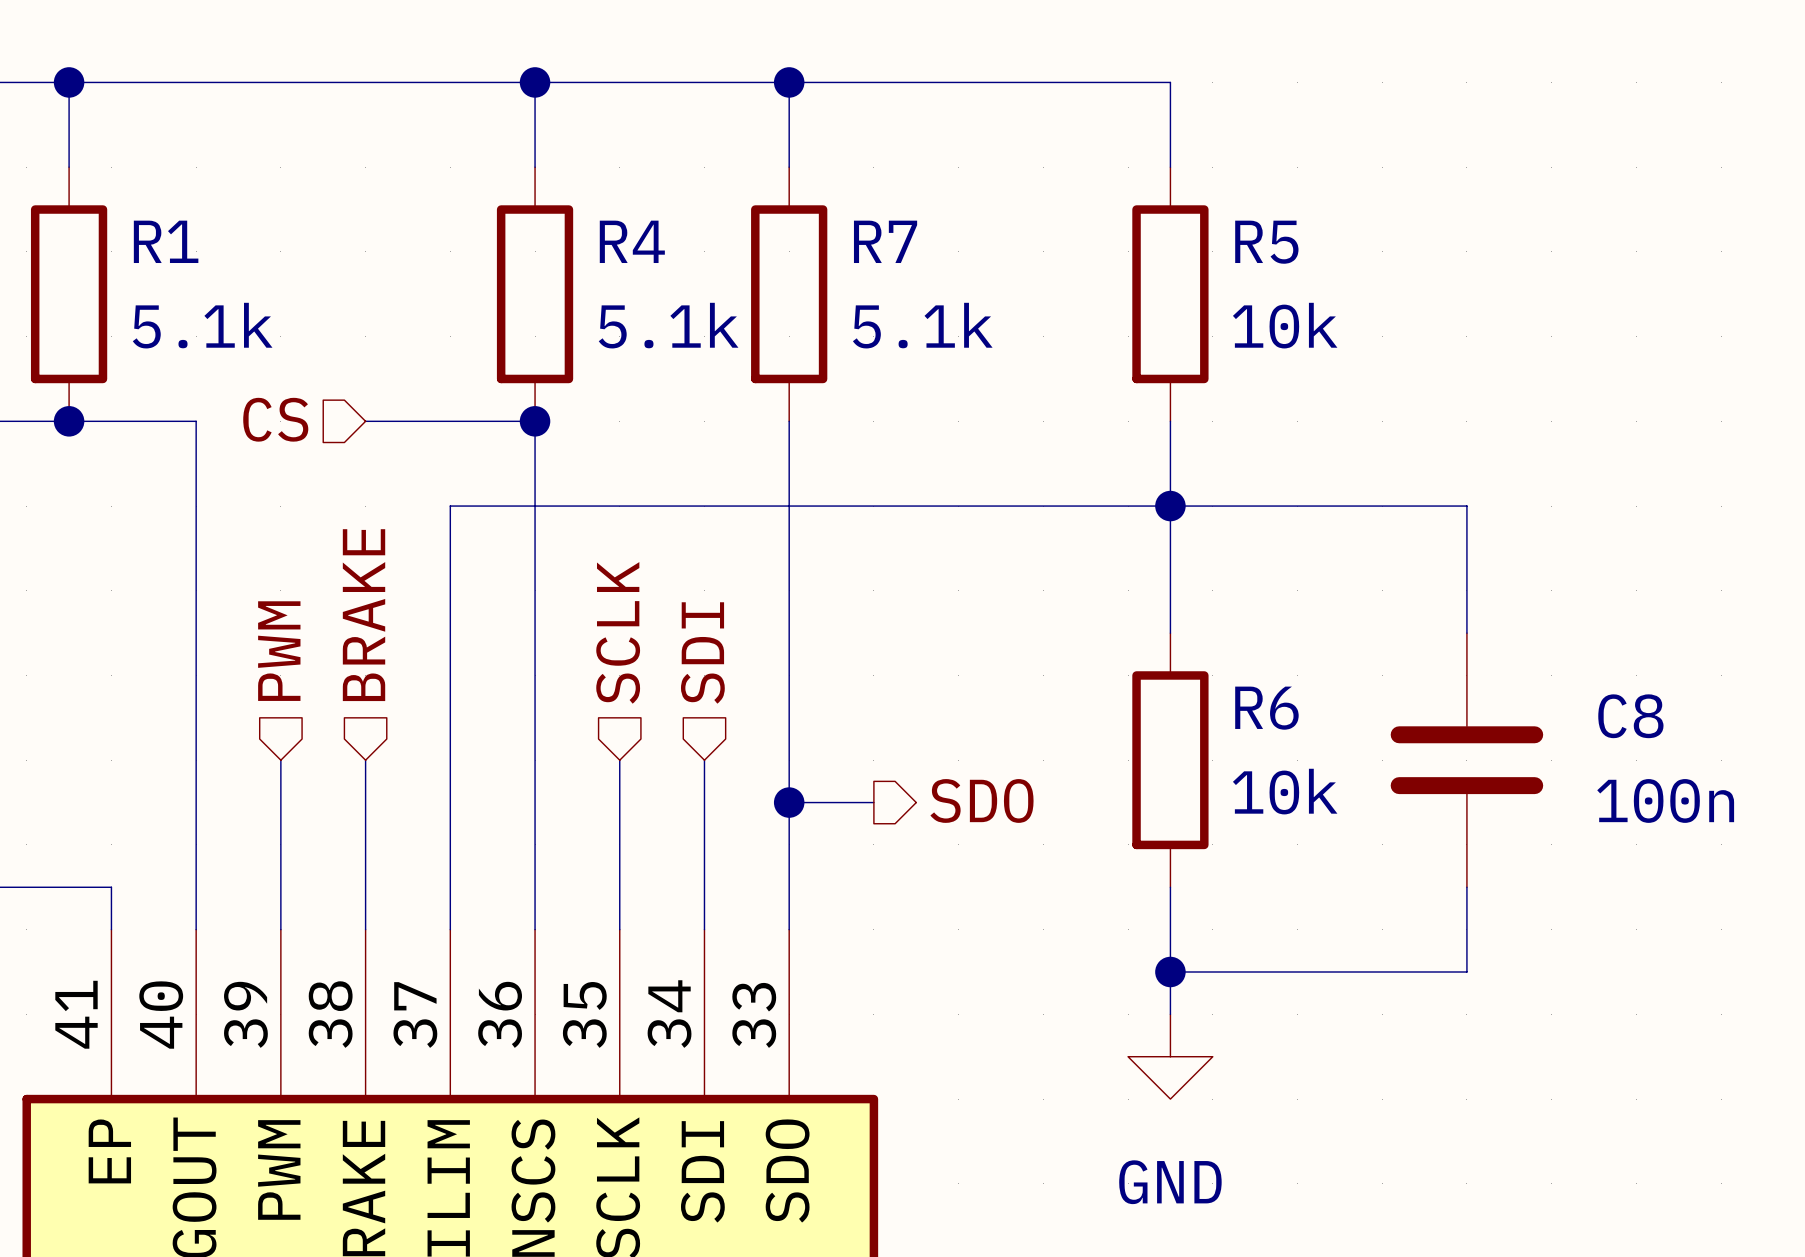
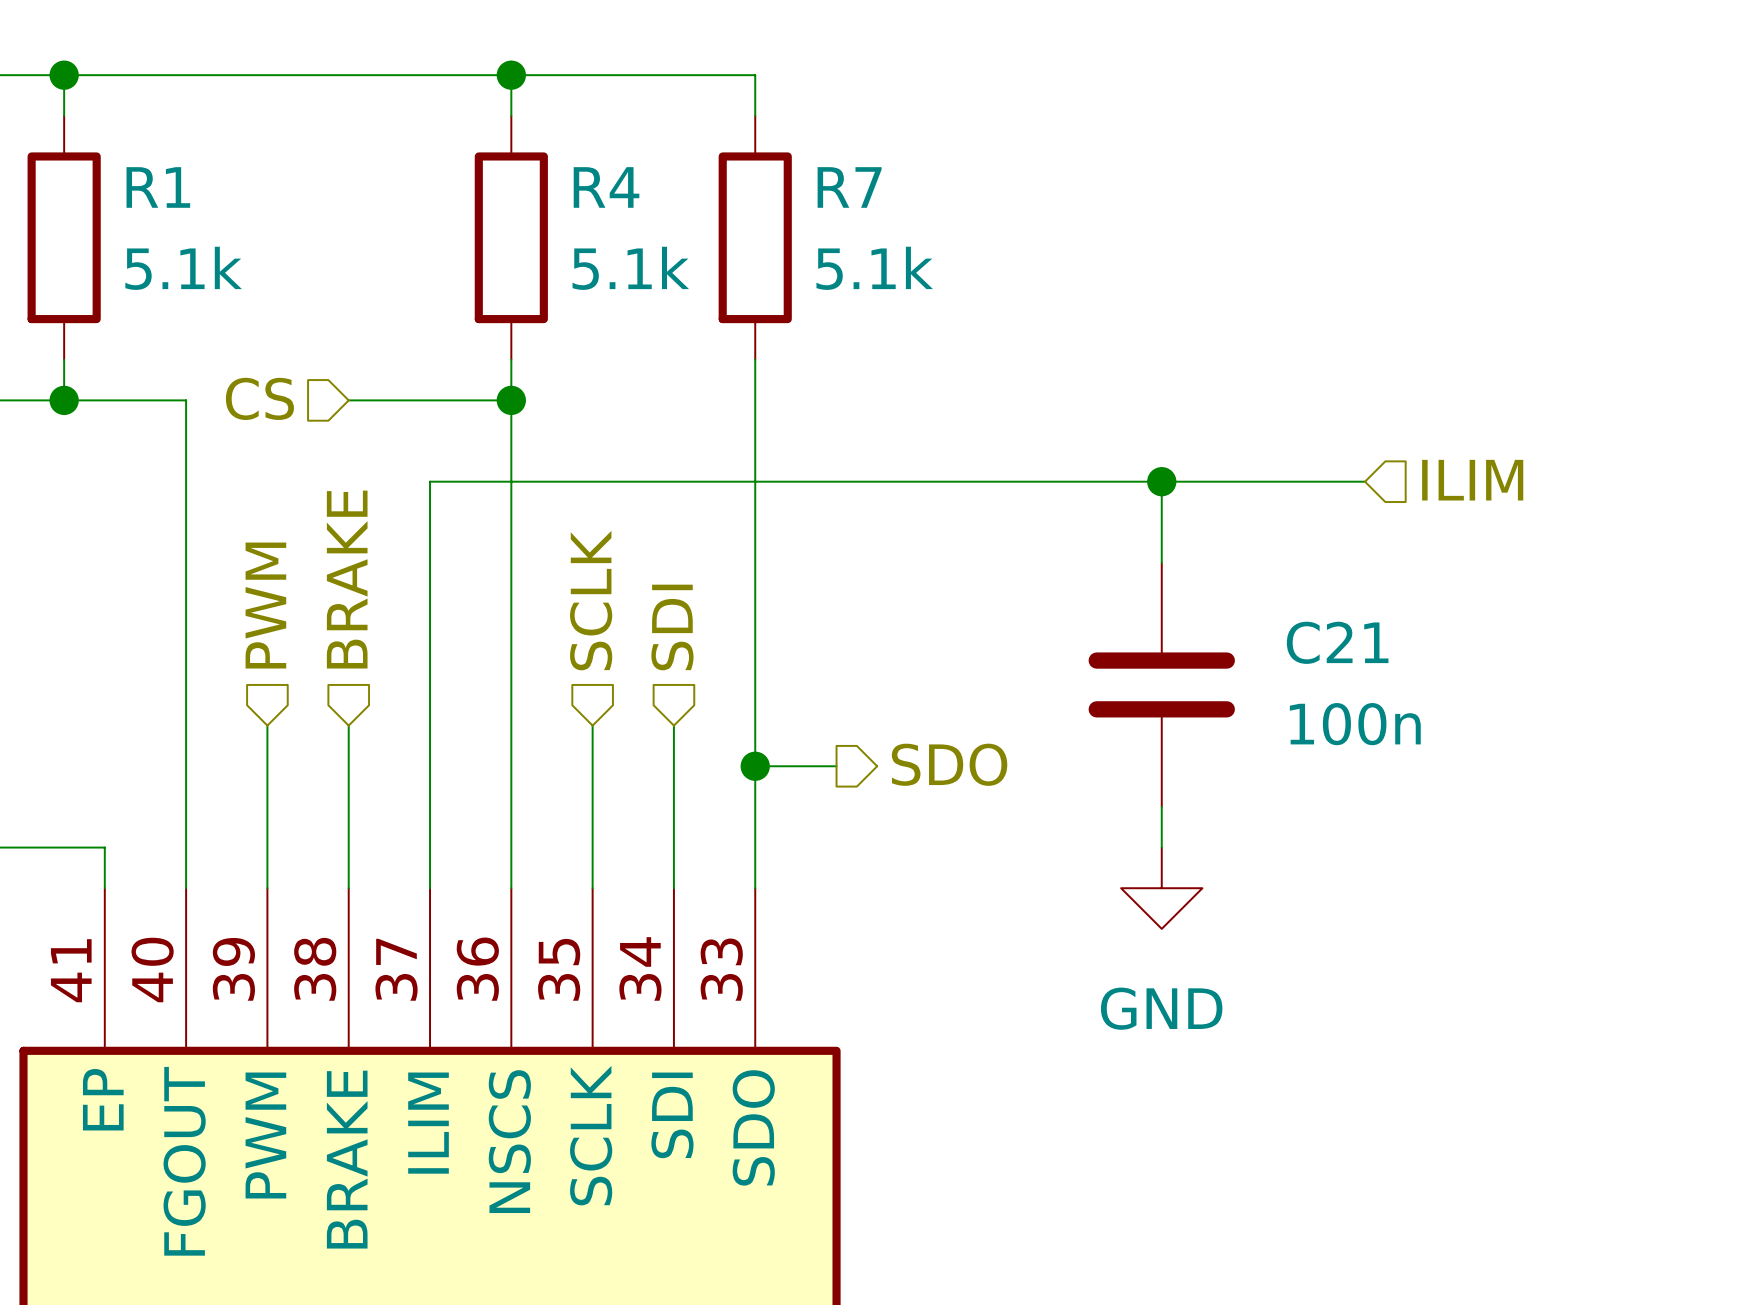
wire: (789, 82) (1170, 82) (1170, 167) -> none
junction: (789, 82) -> none
R1 position: (69, 294) -> (64, 237)
R4 position: (535, 294) -> (511, 237)
R7 position: (789, 294) -> (755, 237)
R5: 10k (1170, 294) -> none
wire: (1170, 421) (1170, 633) -> none
hierarchical label: none -> ILIM (1472, 480)
junction position: (1170, 506) -> (1161, 481)
wire: none -> (1161, 481) (1161, 562)
wire: (1424, 506) (1466, 506) (1466, 633) -> none
C21: none -> 100n (1161, 684)
R6: 10k (1170, 760) -> none
C8: 100n (1466, 760) -> none
wire: none -> (1161, 806) (1161, 847)
wire: (1170, 887) (1170, 1014) -> none
wire: (1466, 887) (1466, 971) (1170, 971) -> none
junction: (1170, 971) -> none
power symbol position: GND (1170, 1056) -> GND (1161, 888)

